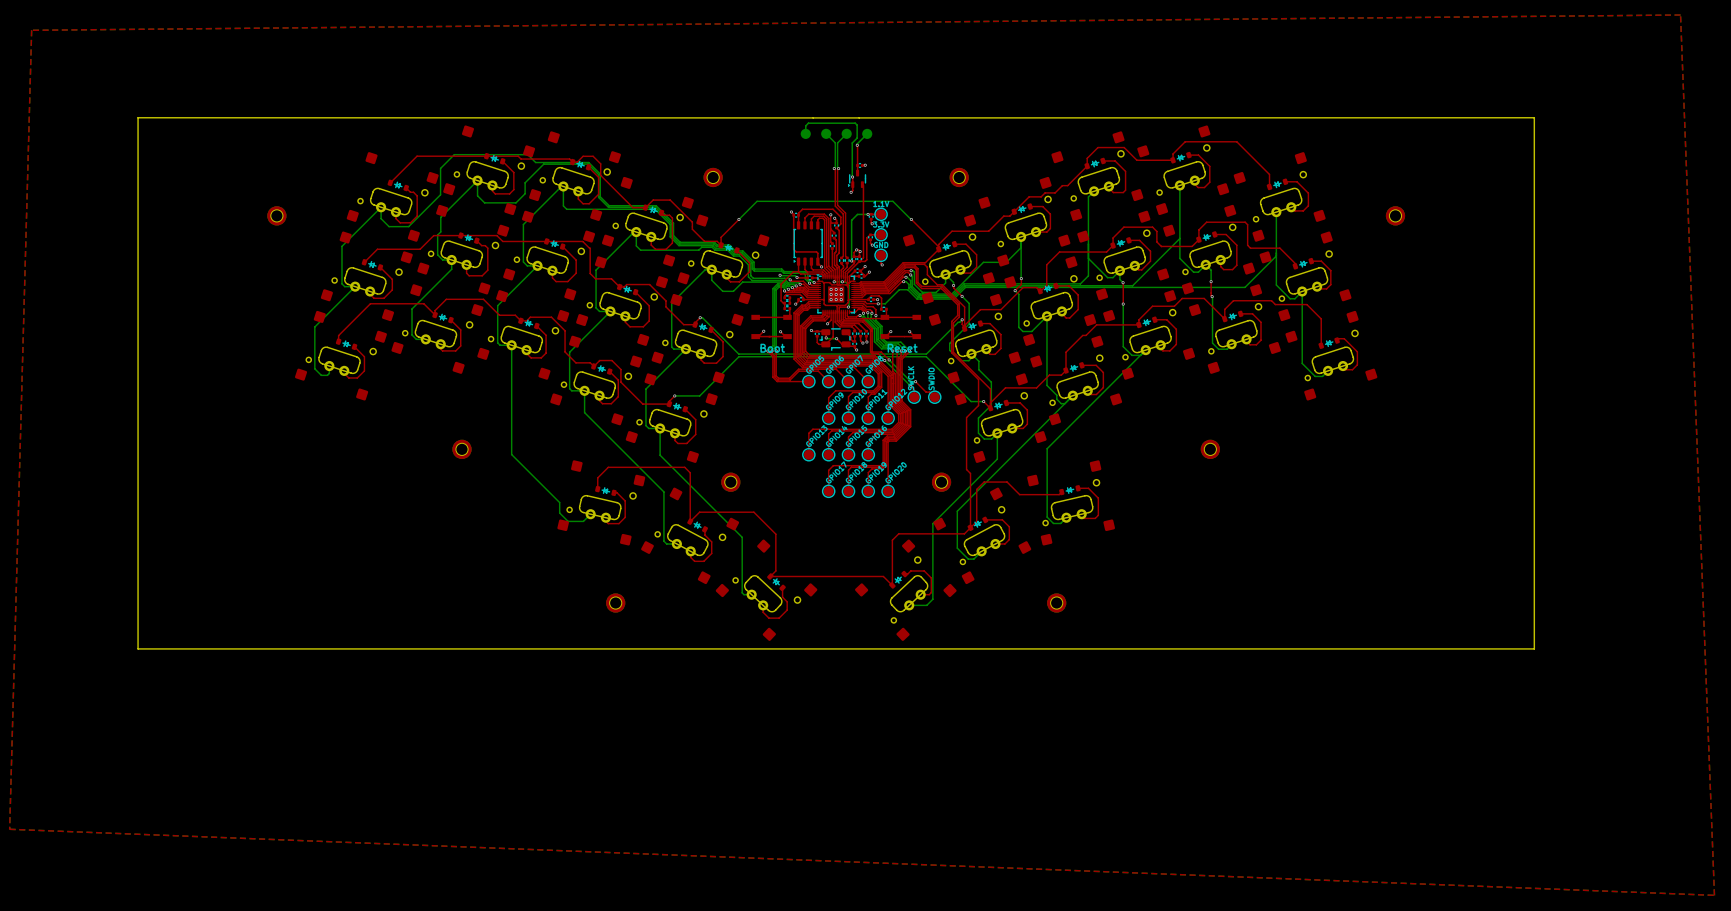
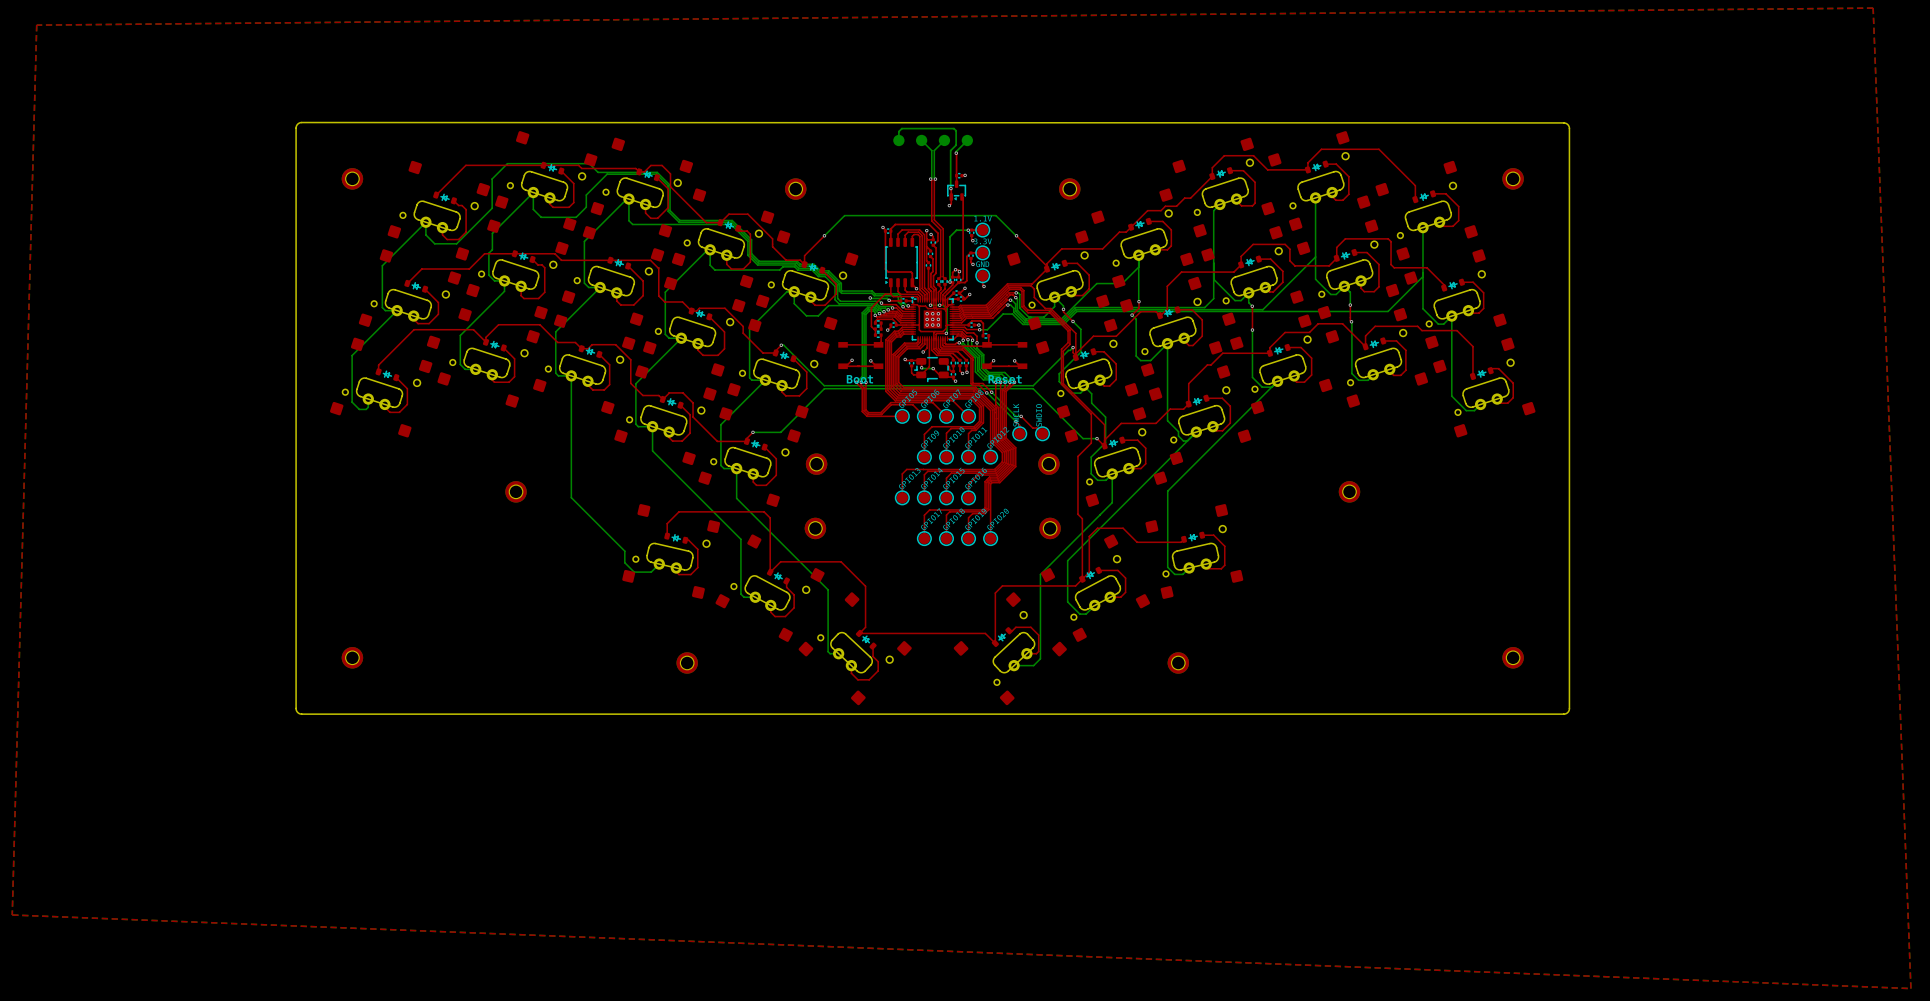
part footprint: [847, 169, 866, 188] -> [947, 180, 966, 201]
part position: (276, 215) -> (352, 178)
part position: (1395, 215) -> (1513, 178)
part: none -> (816, 464)
part: none -> (1048, 464)
part: none -> (352, 657)
part: none -> (1513, 657)
board edge: (269, 648) (138, 648) (138, 117) (1534, 117) (1534, 648) (1402, 648) -> (301, 714) (297, 712) (296, 708) (296, 128) (297, 124) (301, 122) (1565, 123) (1569, 128) (1569, 708) (1567, 712) (1563, 714)

